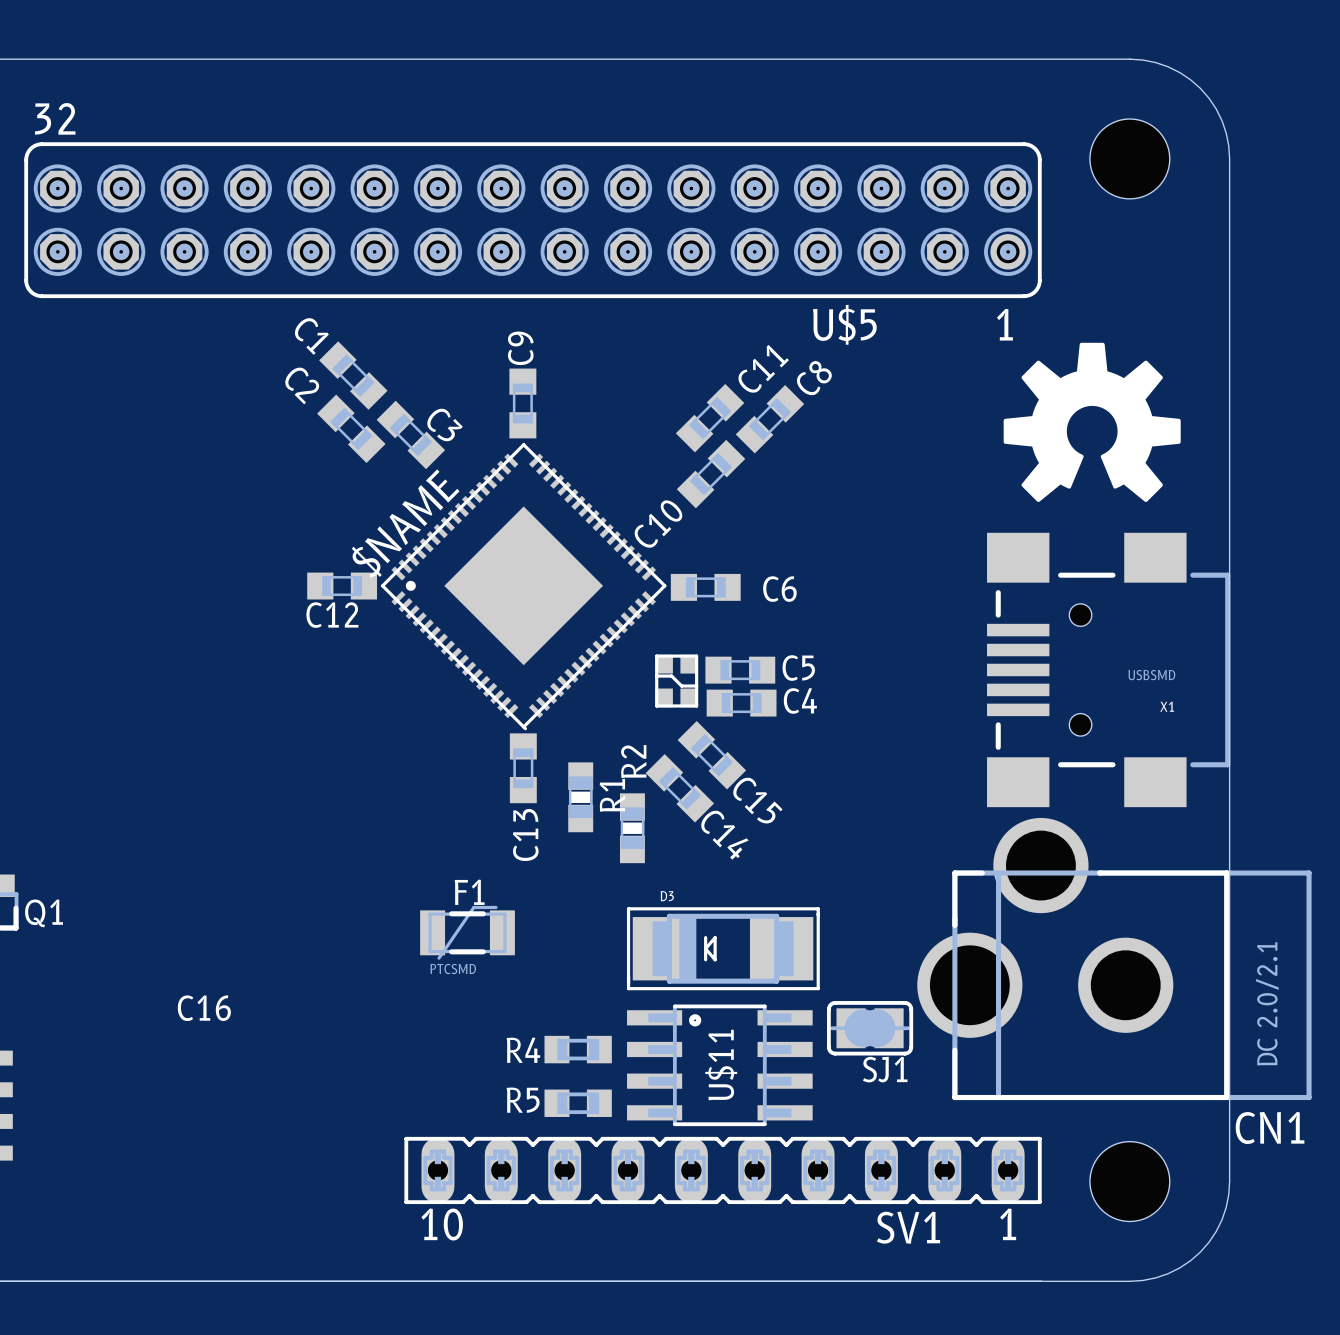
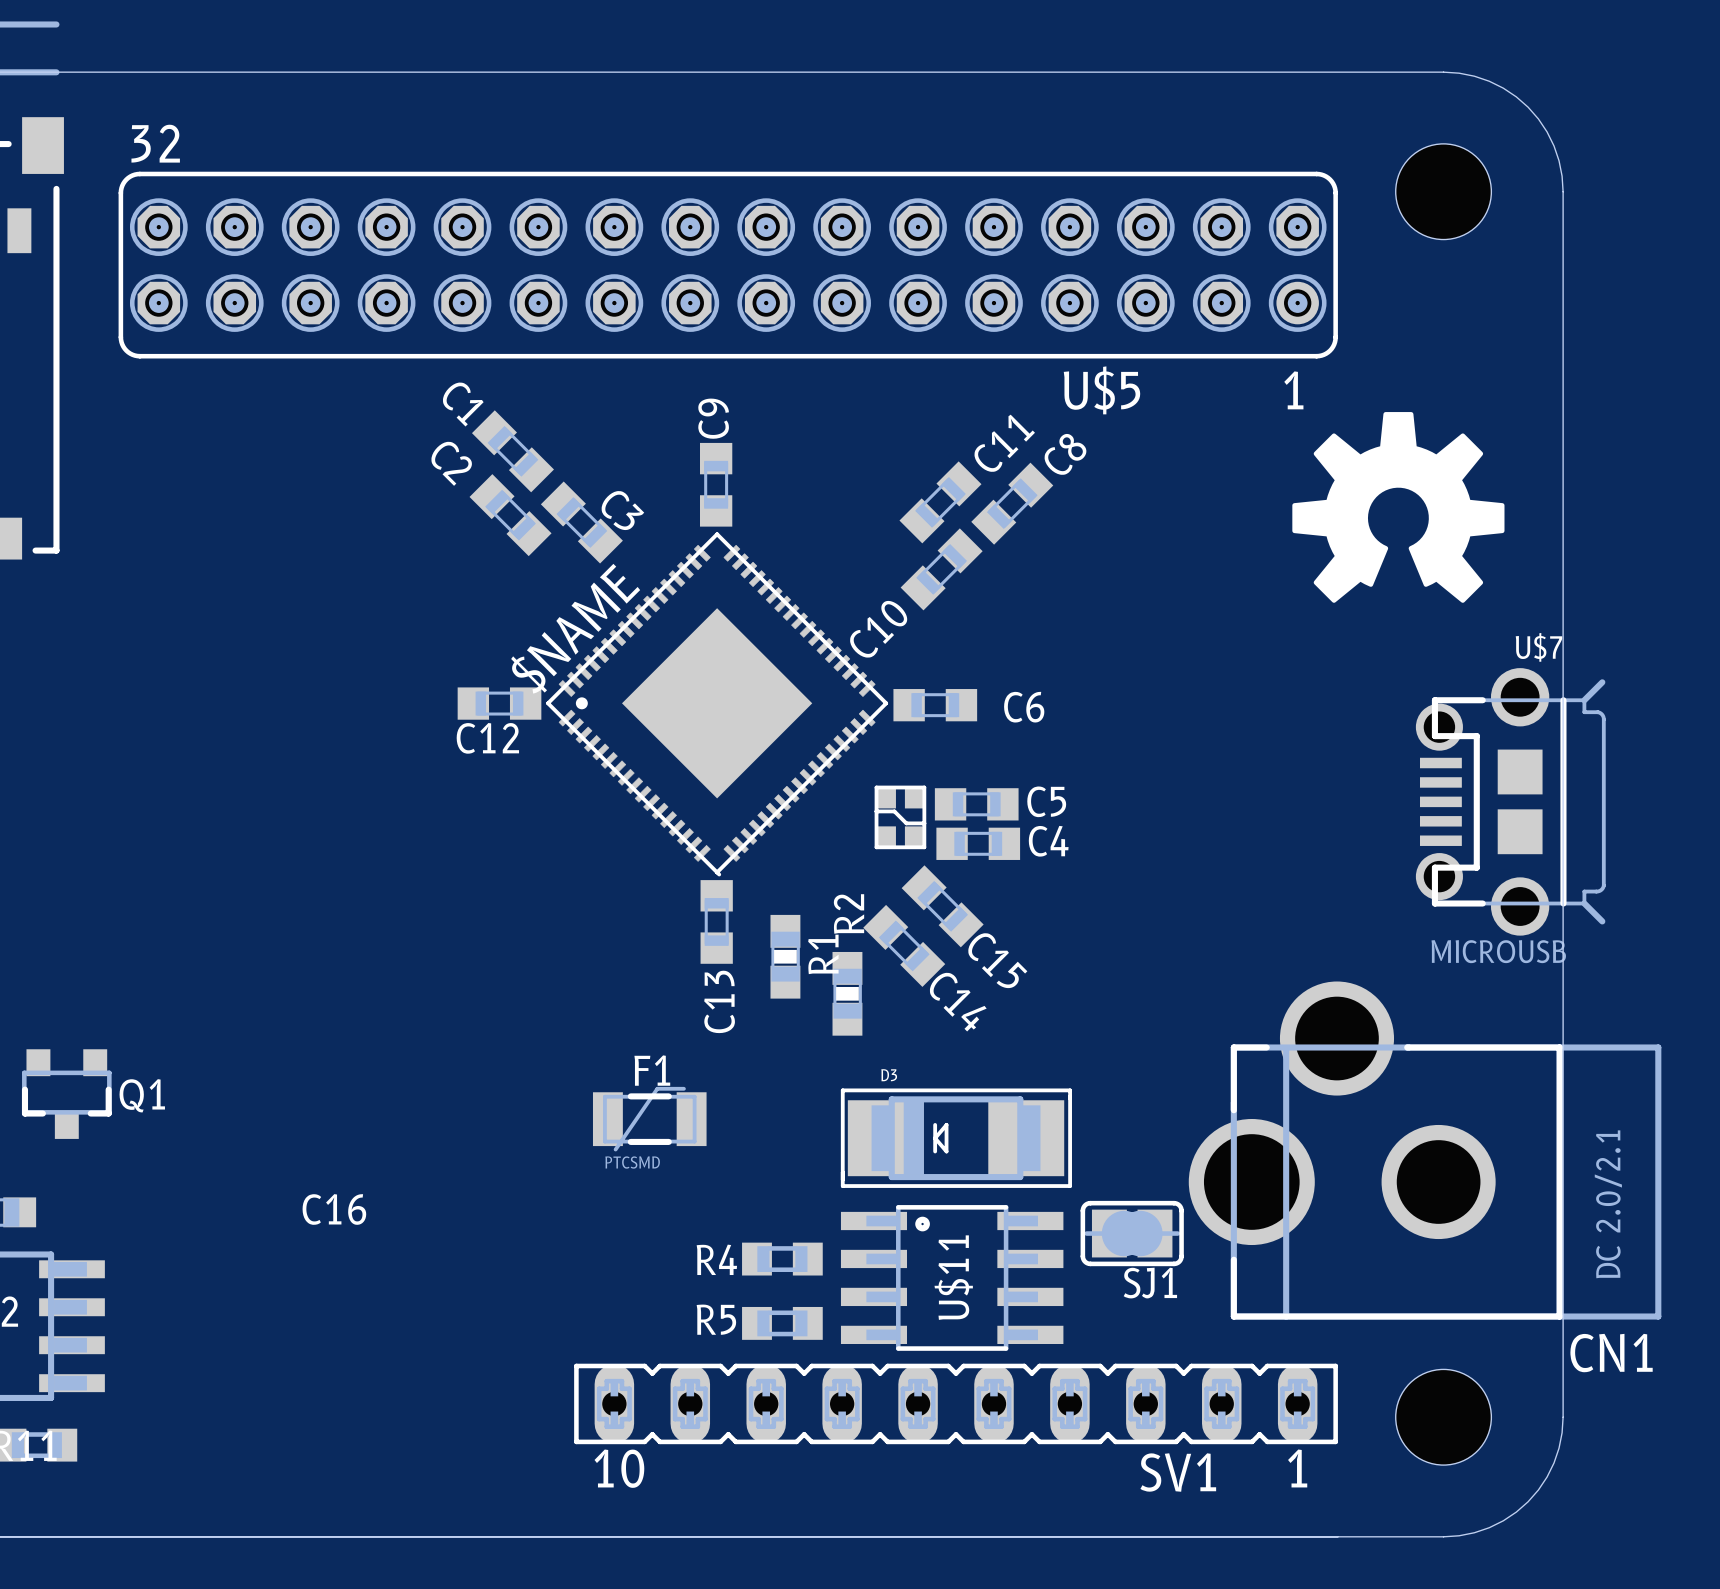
U$7: none -> MICROUSB (1510, 801)
X1: USBSMD (1108, 669) -> none

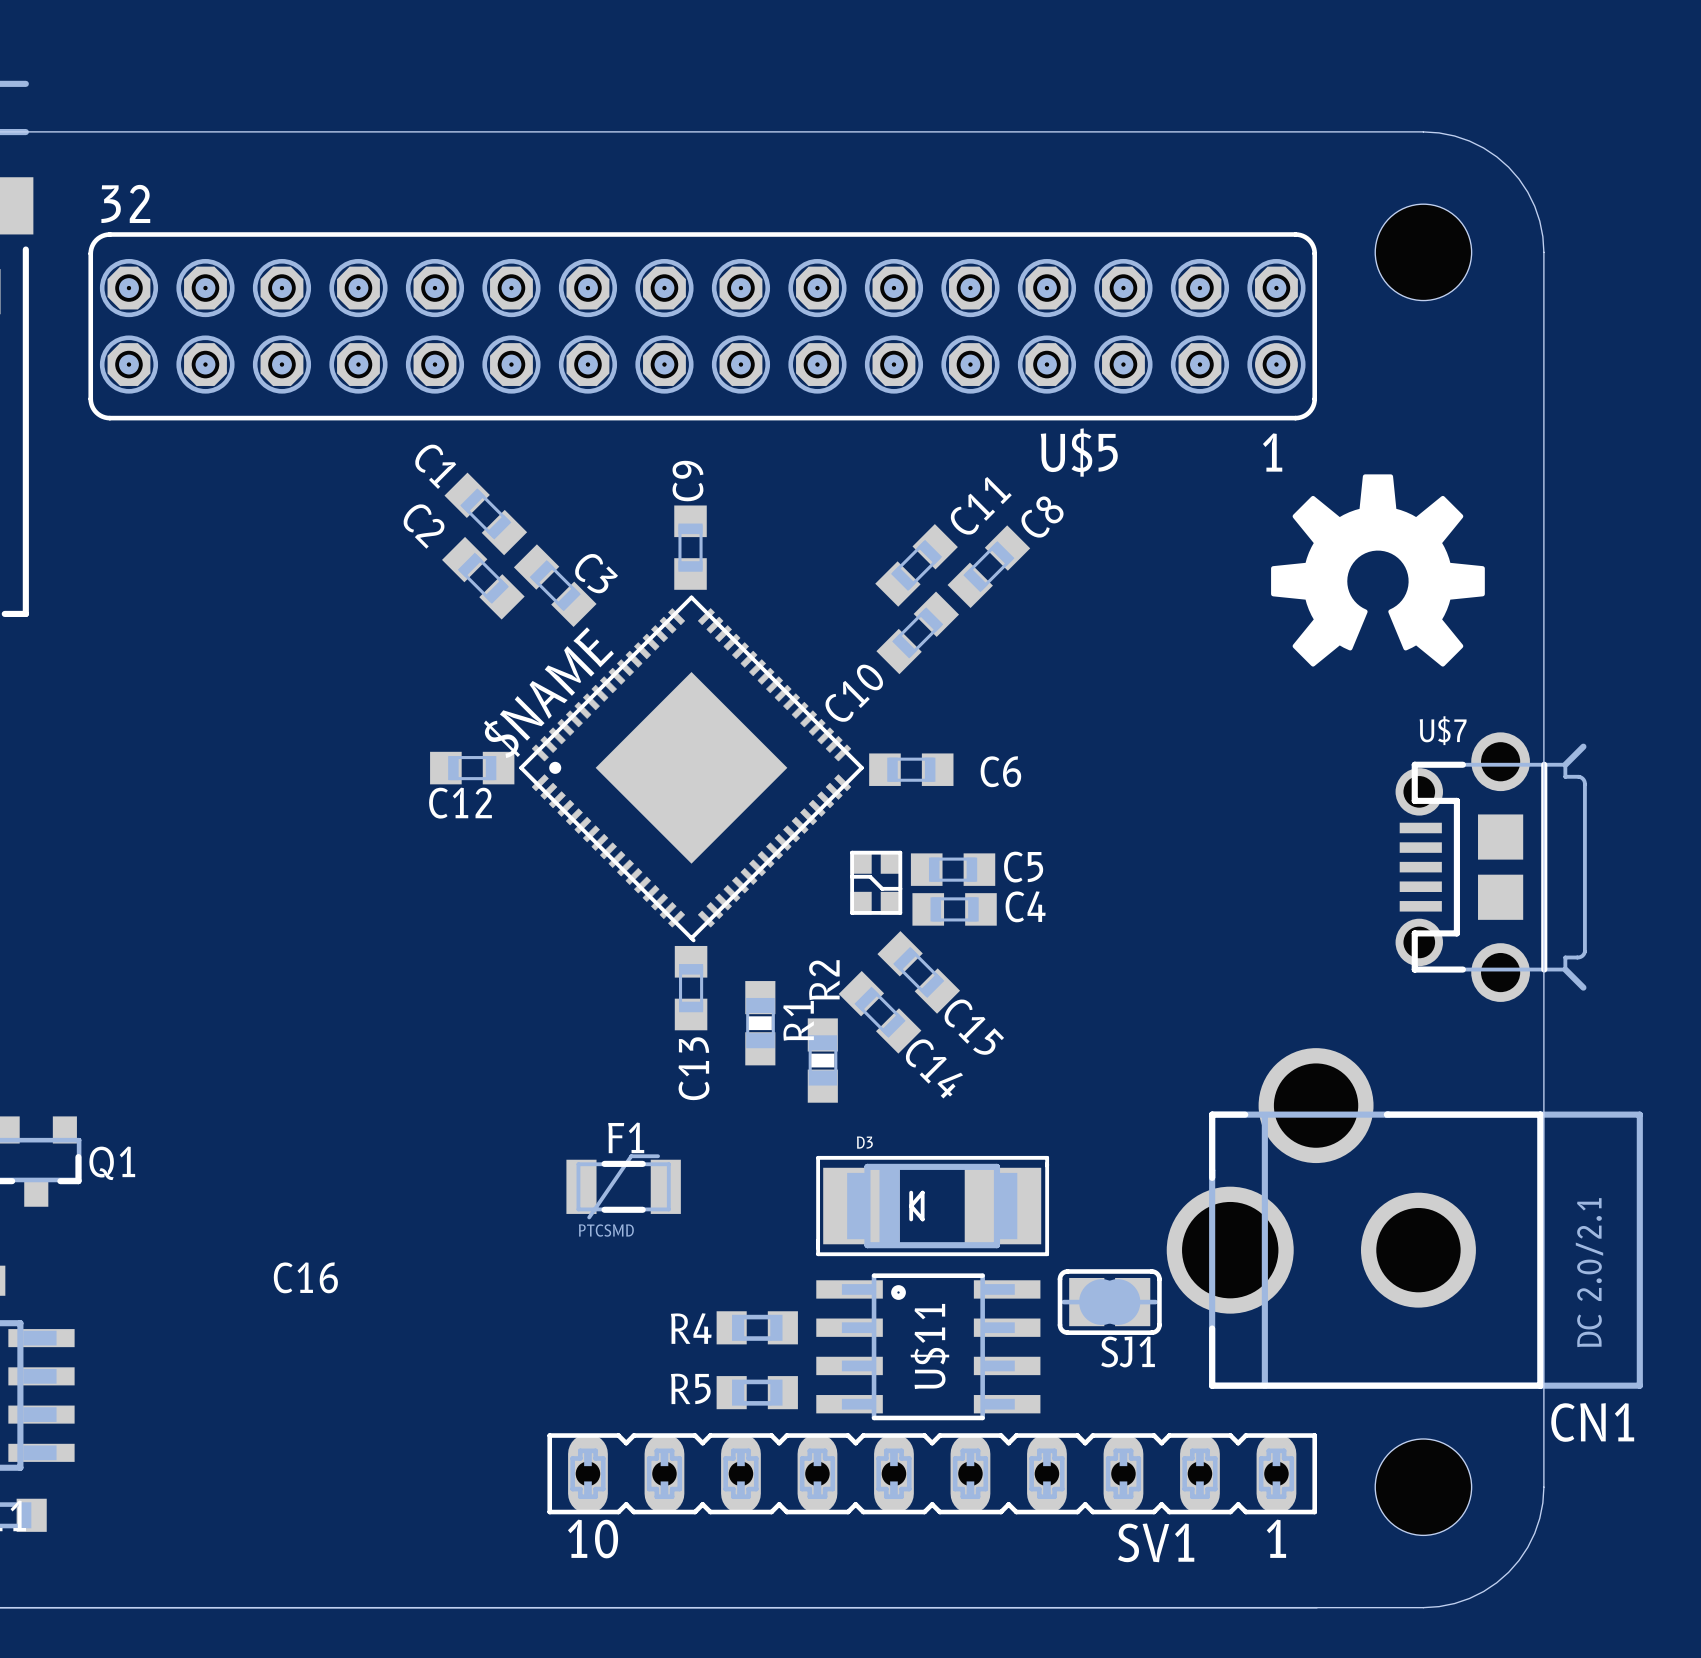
U$7 name position: U$7 (1539, 647) -> U$7 (1443, 730)
U$7 value: MICROUSB (1498, 951) -> none

